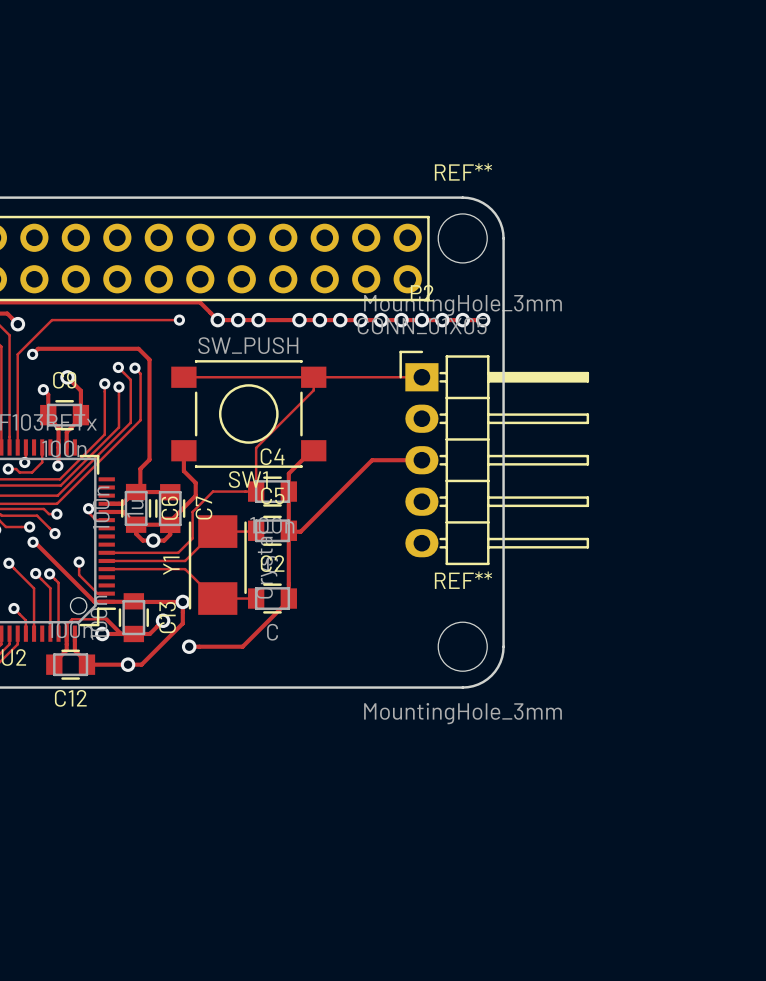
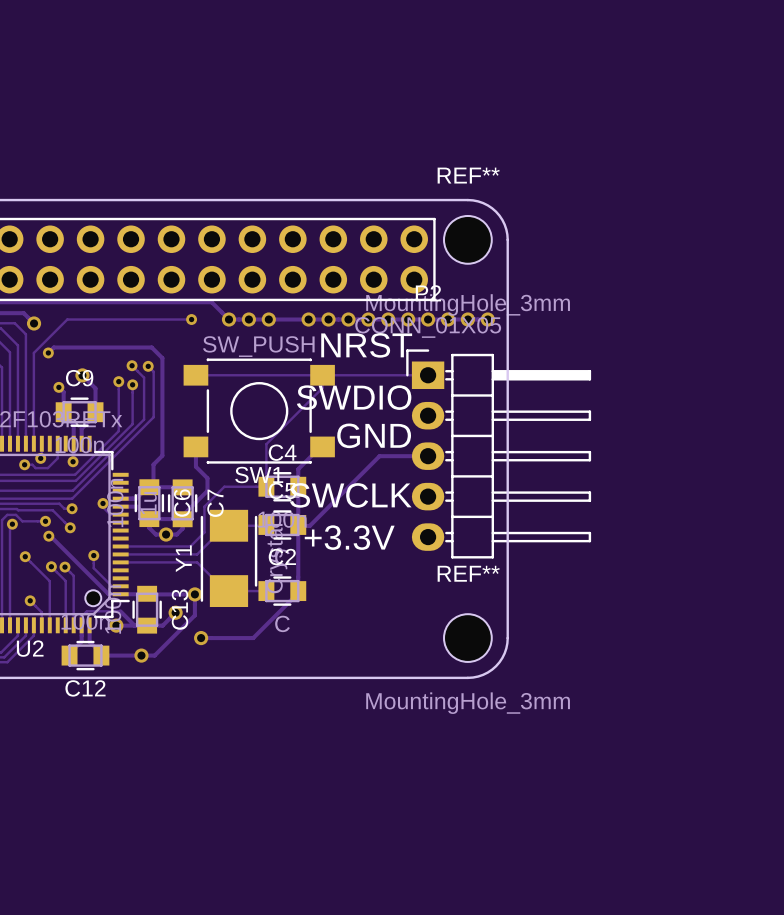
text: none -> NRST (366, 345)
text: none -> SWDIO (354, 397)
text: none -> GND (374, 435)
text: none -> SWCLK (350, 495)
text: none -> +3.3V (349, 537)

